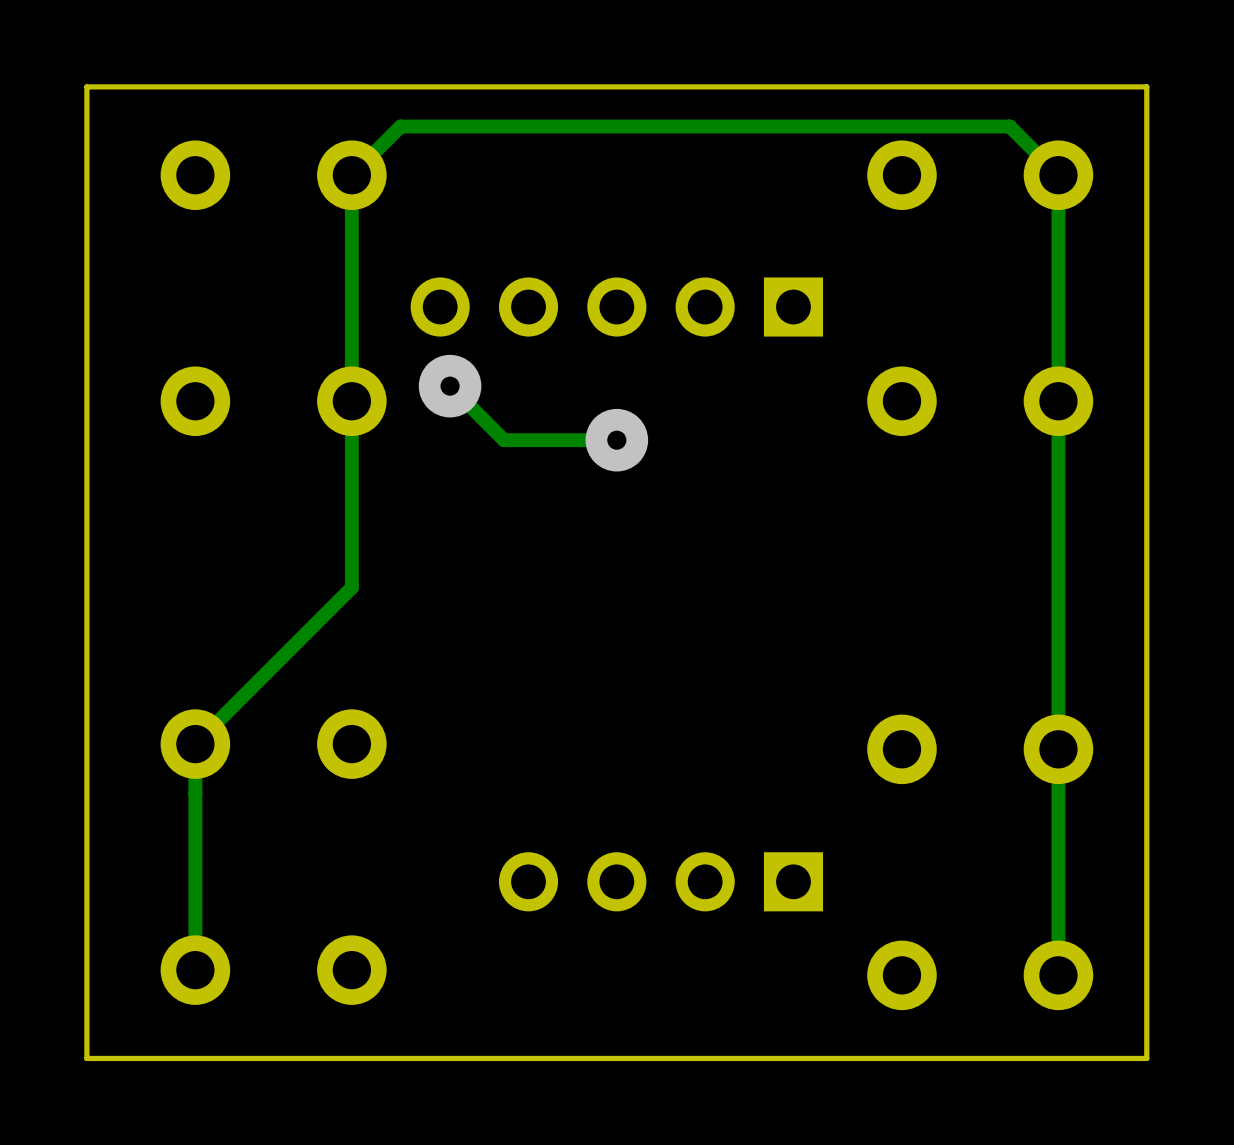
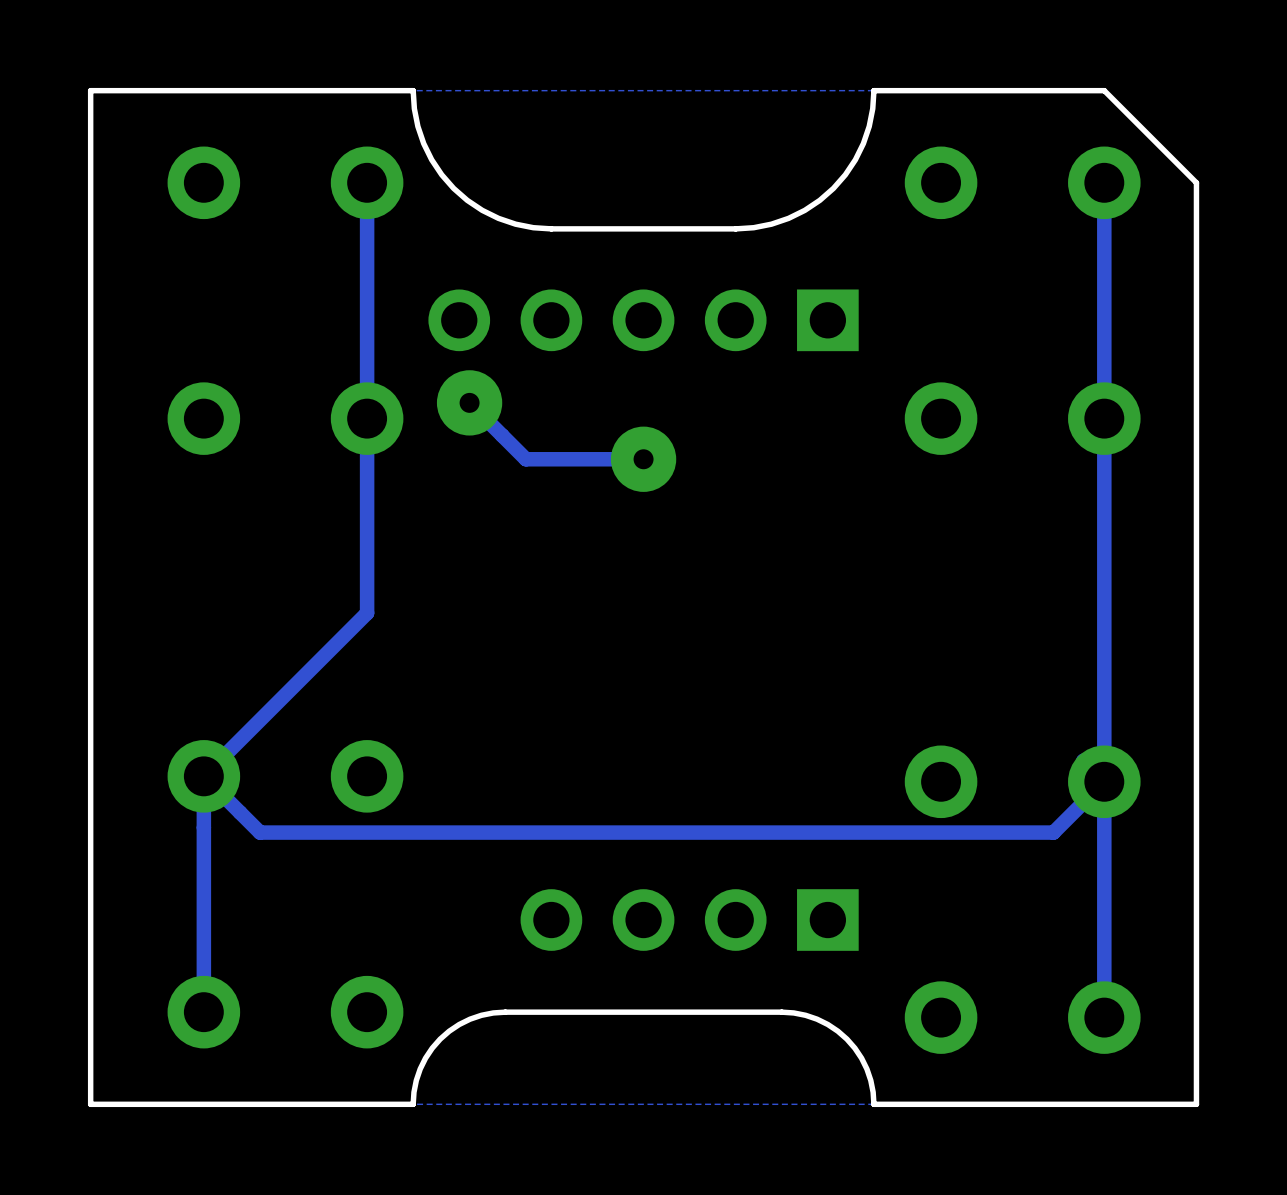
board edge: (837, 86) (396, 86) -> (873, 90) (872, 108) (863, 143) (855, 159) (833, 188) (804, 210) (788, 218) (753, 227) (735, 228) (551, 228) (533, 227) (498, 218) (482, 210) (453, 188) (431, 159) (417, 126) (413, 90)
board edge: (1058, 86) (1146, 86) (1146, 175) -> (1104, 90) (1196, 182)
track: (1058, 175) (1009, 126) (400, 126) (351, 175) -> none
track: none -> (203, 776) (260, 832) (1053, 832) (1104, 781)
board edge: (837, 1058) (396, 1058) -> (873, 1104) (873, 1092) (866, 1069) (861, 1058) (846, 1039) (827, 1024) (817, 1019) (793, 1012) (781, 1012) (505, 1012) (481, 1015) (459, 1024) (449, 1031) (432, 1048) (420, 1069) (413, 1092) (413, 1104)

